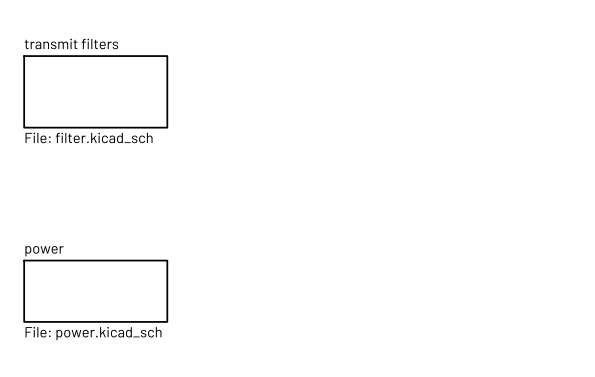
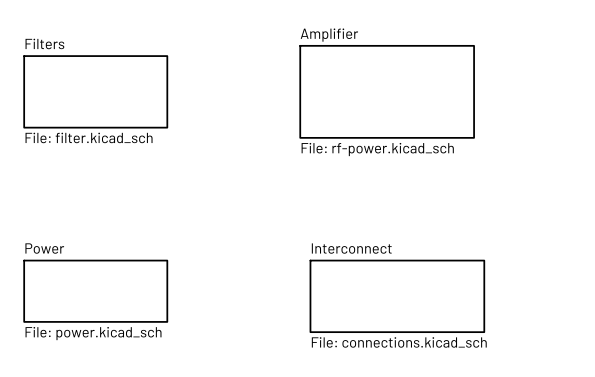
sheet transmit filters name: transmit filters (71, 43) -> Filters (44, 43)
sheet Amplifier: none -> File: rf-power.kicad_sch (387, 91)
sheet power name: power (44, 251) -> Power (44, 248)
sheet Interconnect: none -> File: connections.kicad_sch (397, 296)

